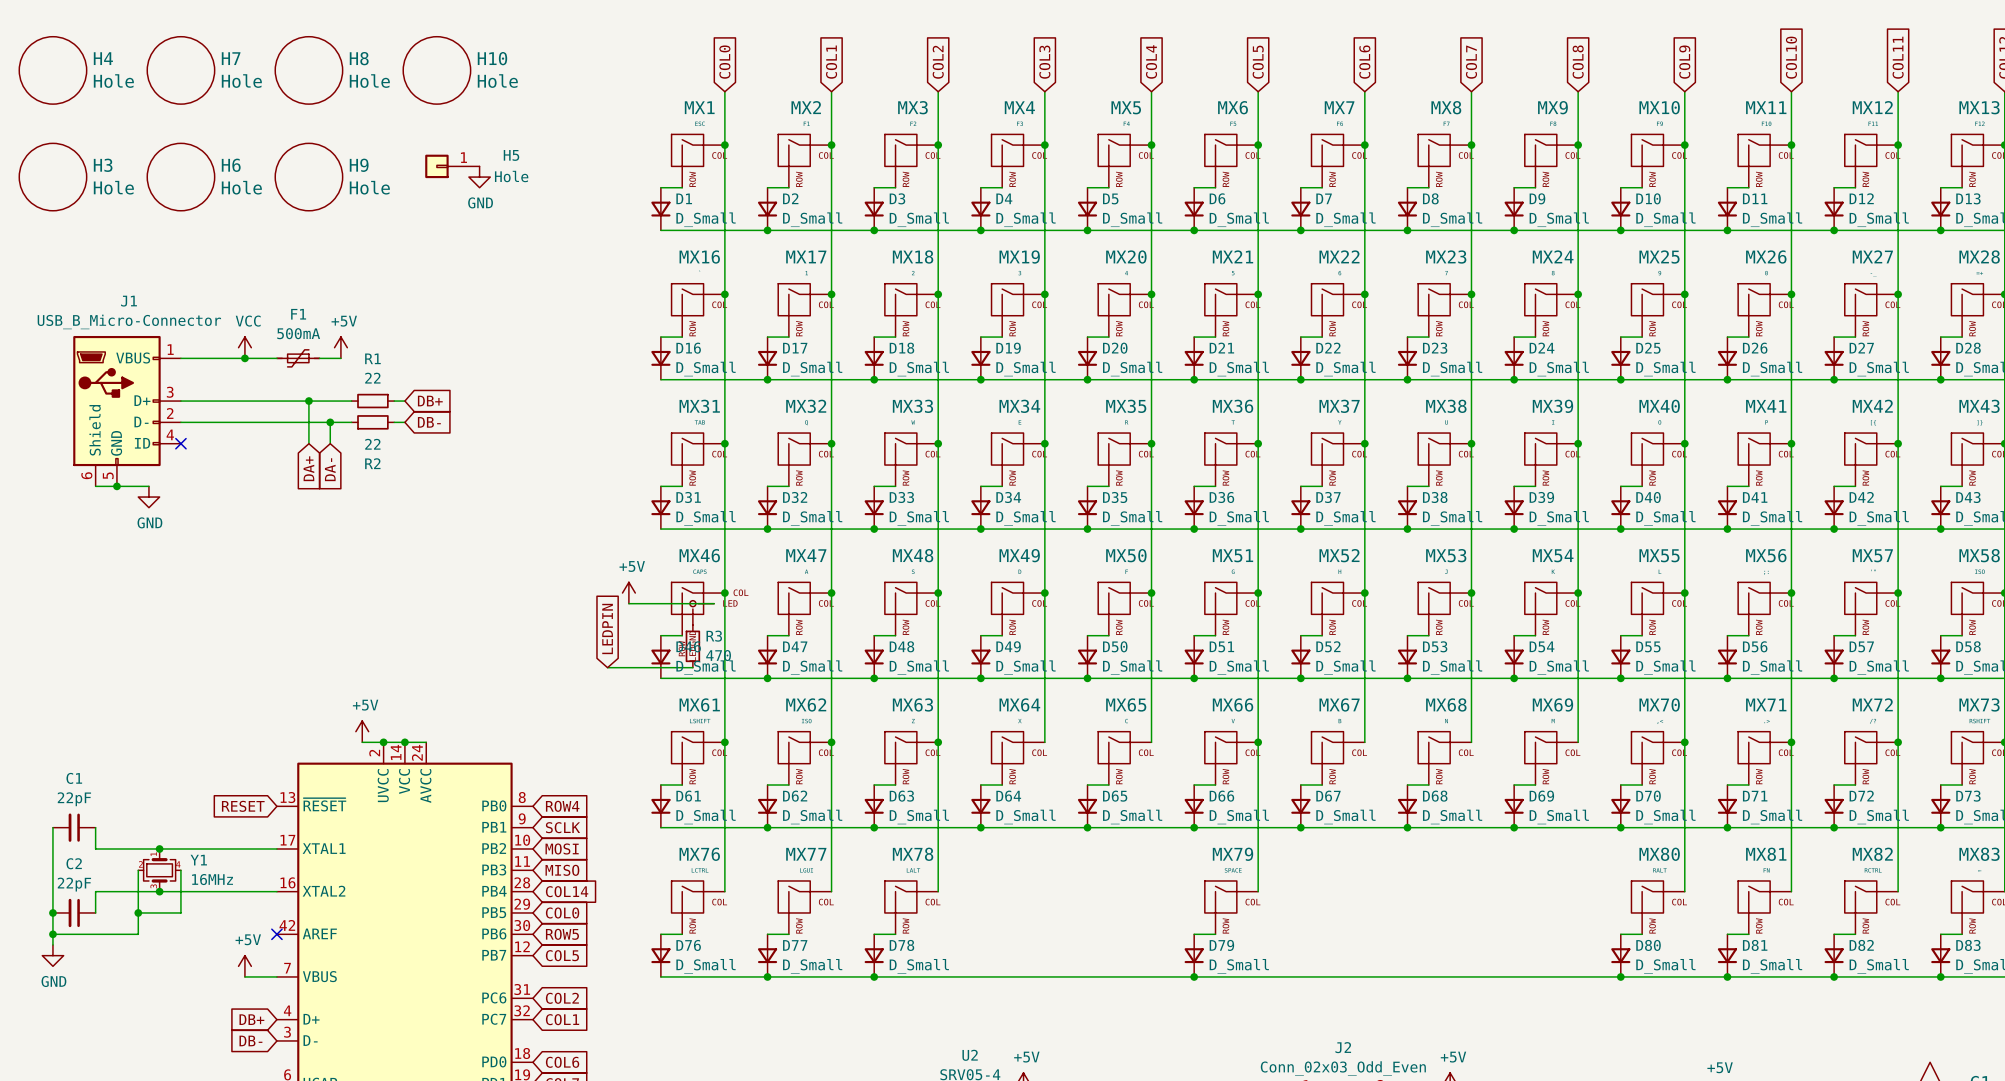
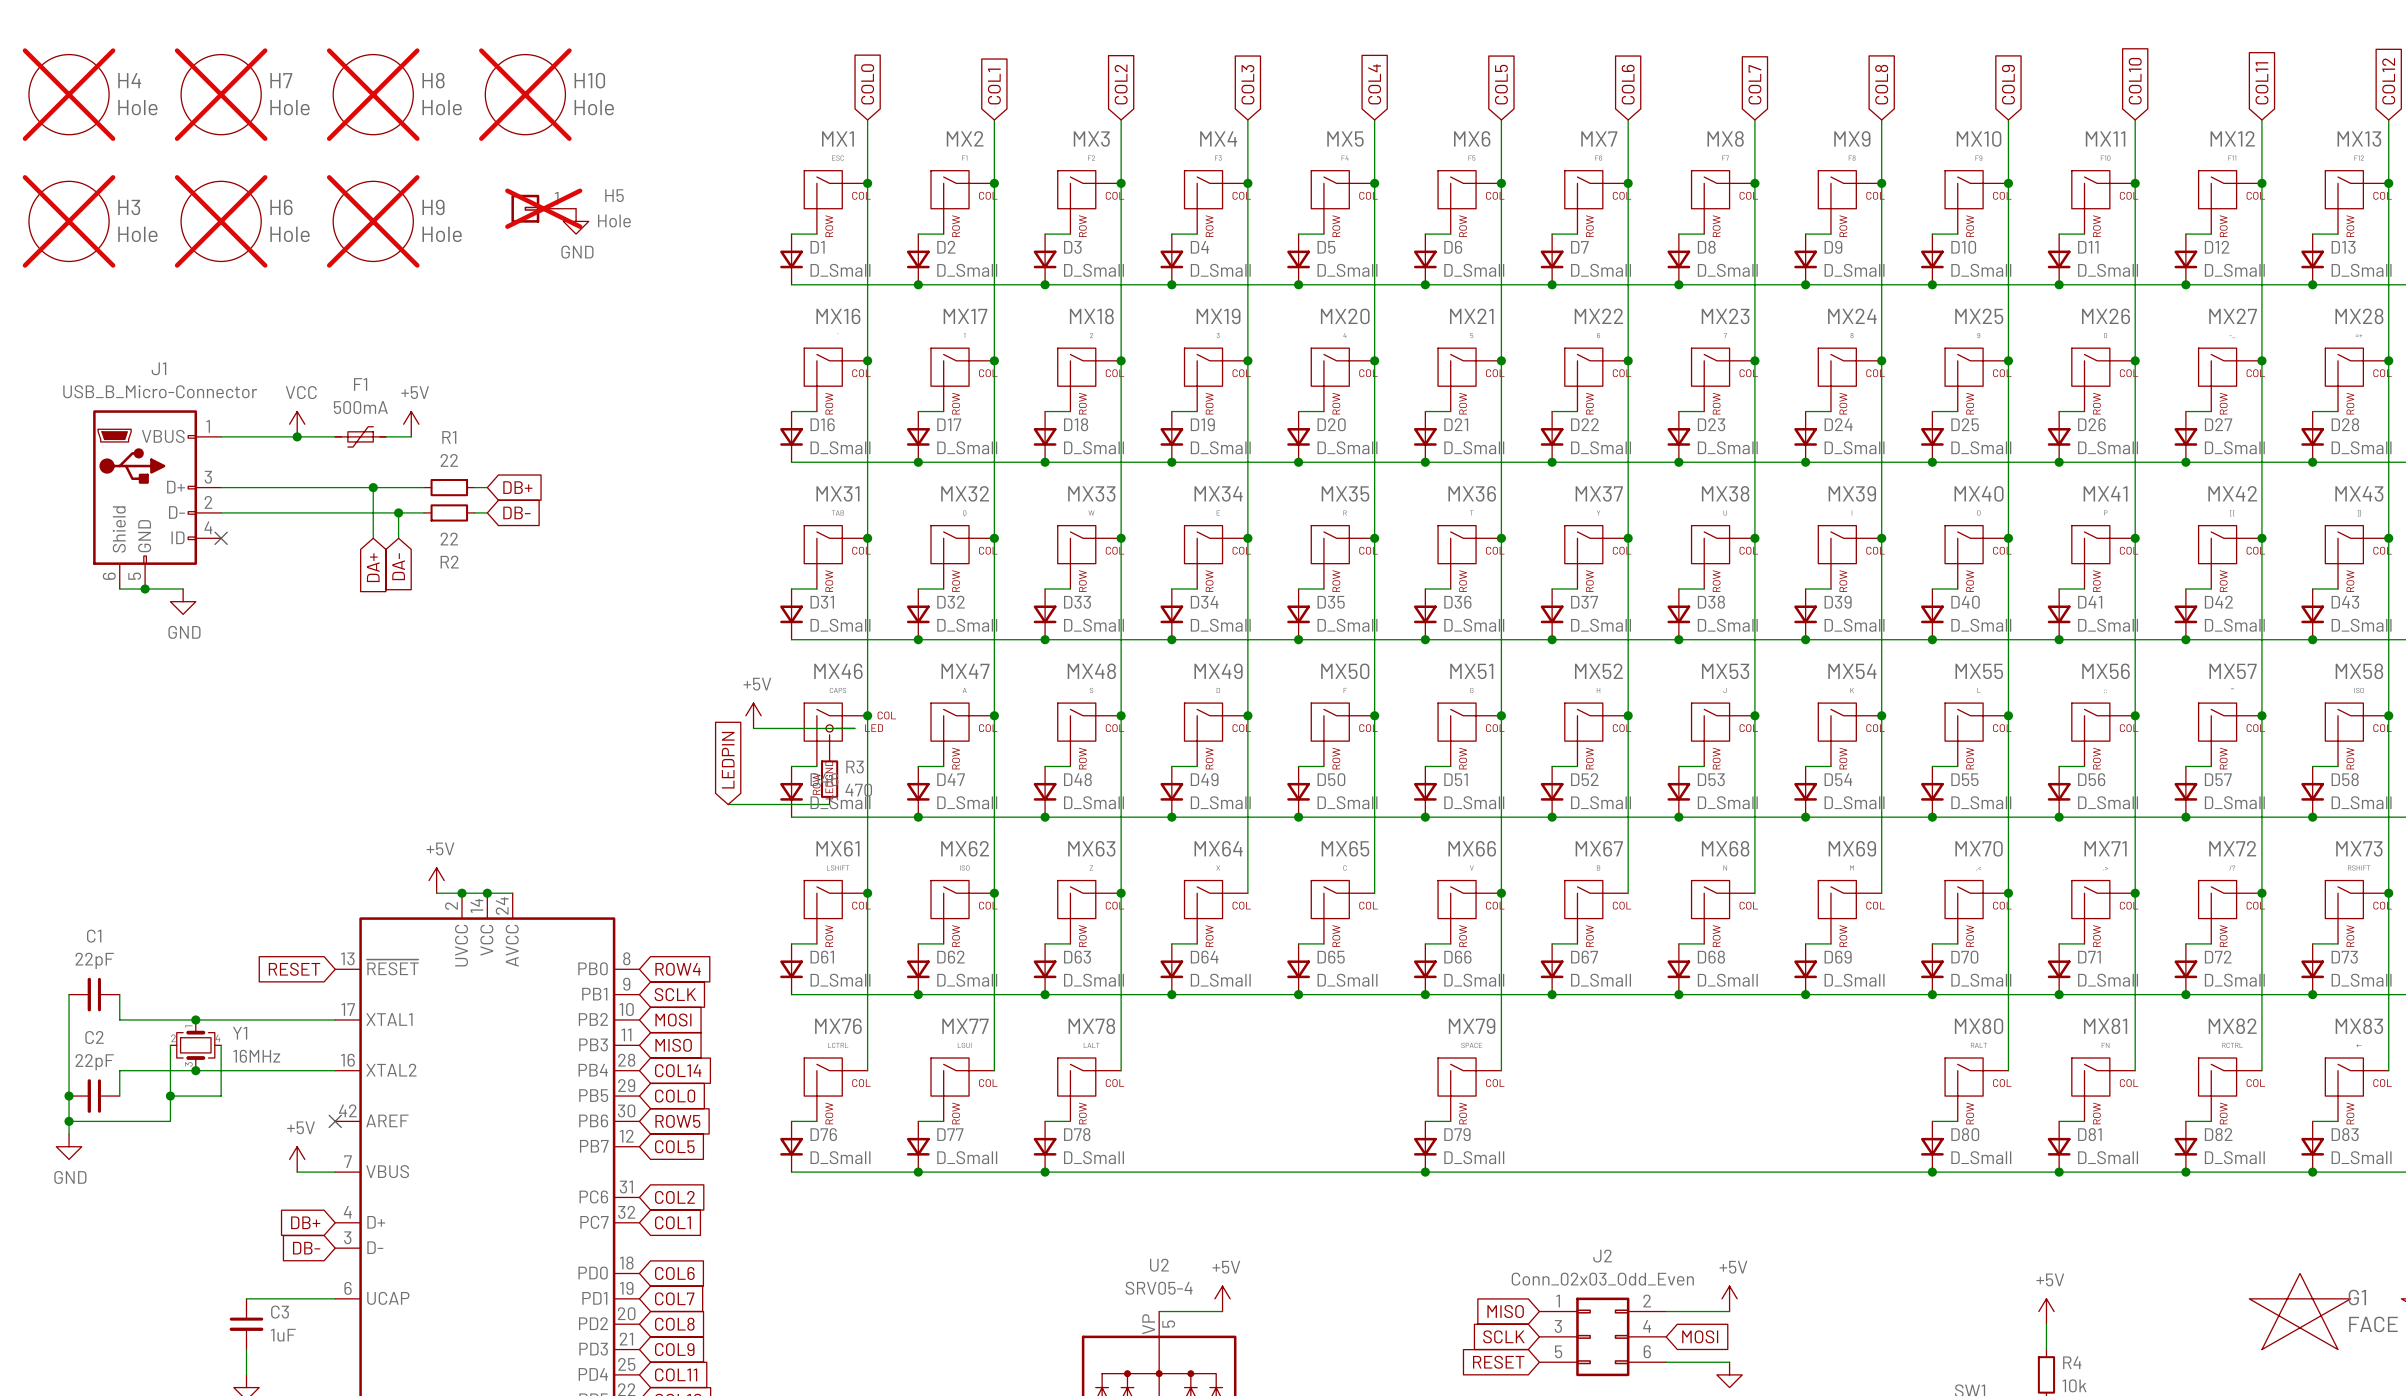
H4 do-not-place cross: none -> (69, 94)
H7 do-not-place cross: none -> (221, 94)
H8 do-not-place cross: none -> (373, 94)
H10 do-not-place cross: none -> (525, 94)
H5 do-not-place cross: none -> (543, 208)
H3 do-not-place cross: none -> (69, 221)
H6 do-not-place cross: none -> (221, 221)
H9 do-not-place cross: none -> (373, 221)

